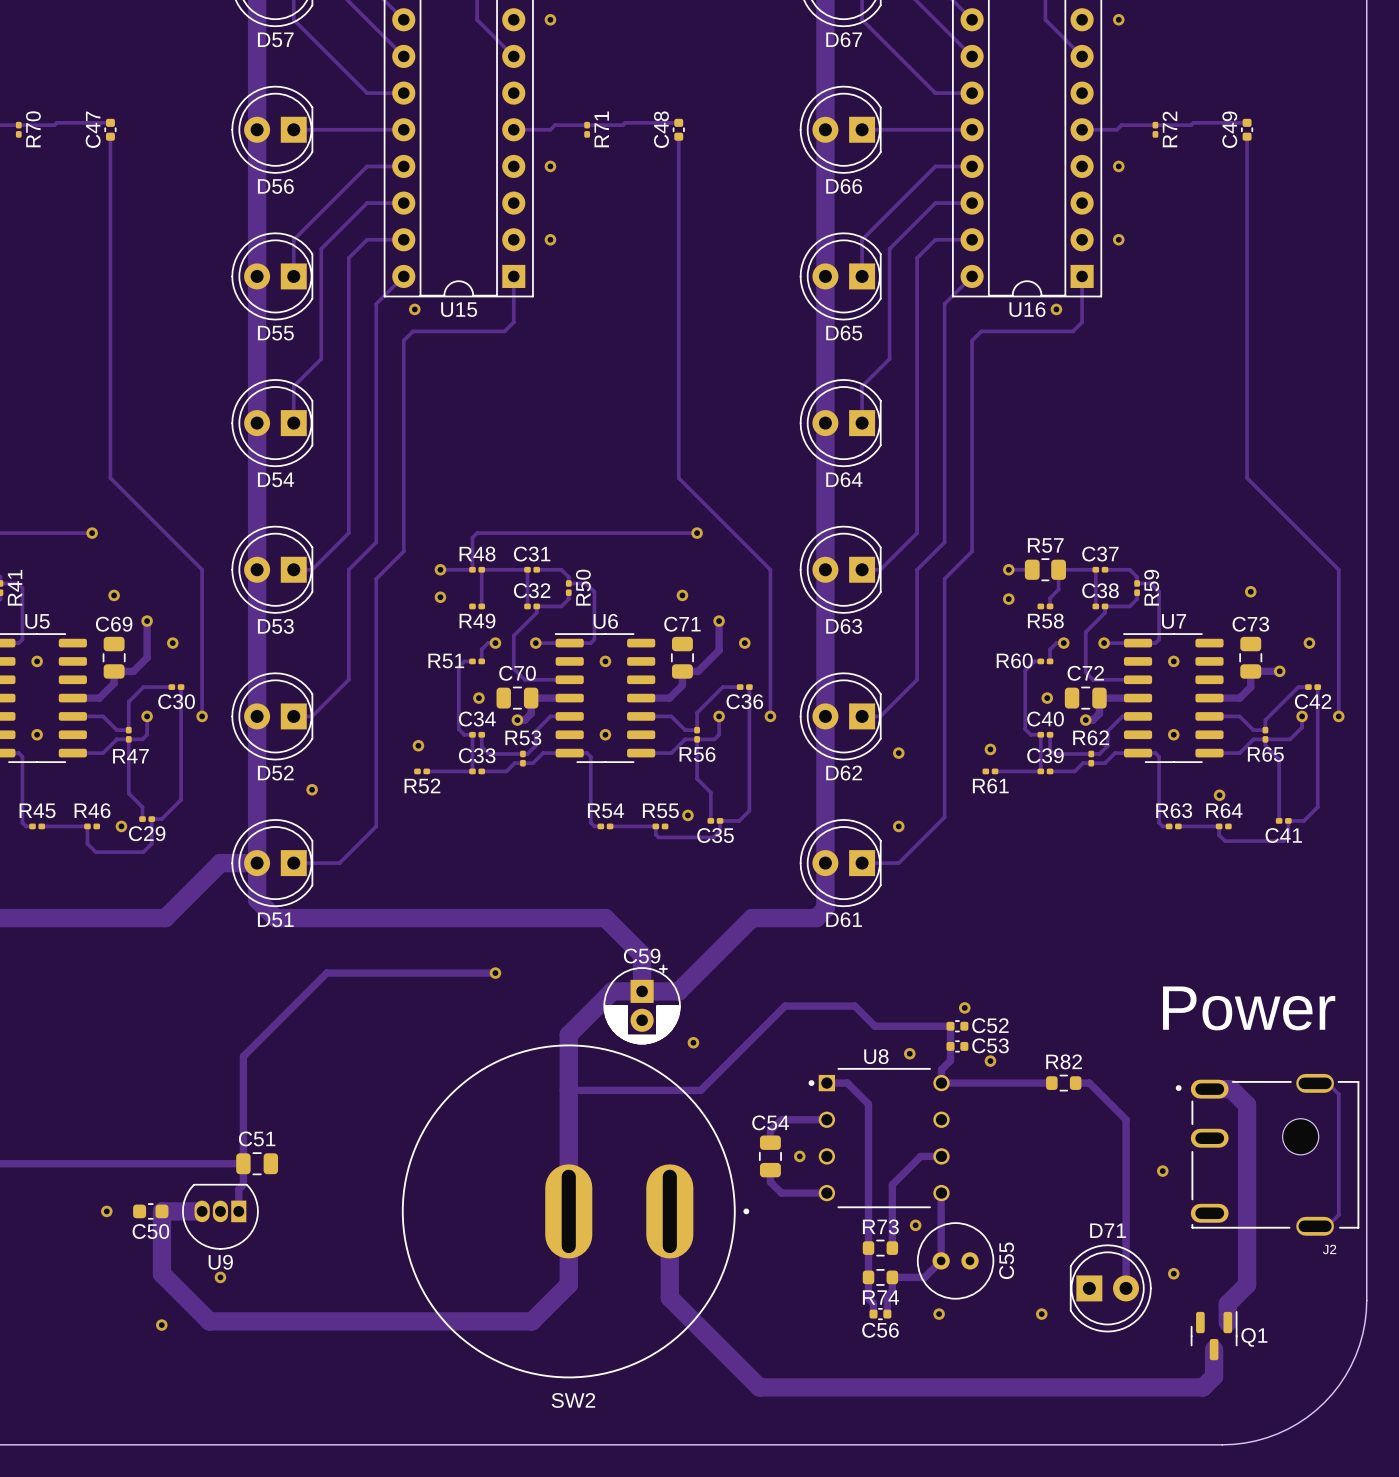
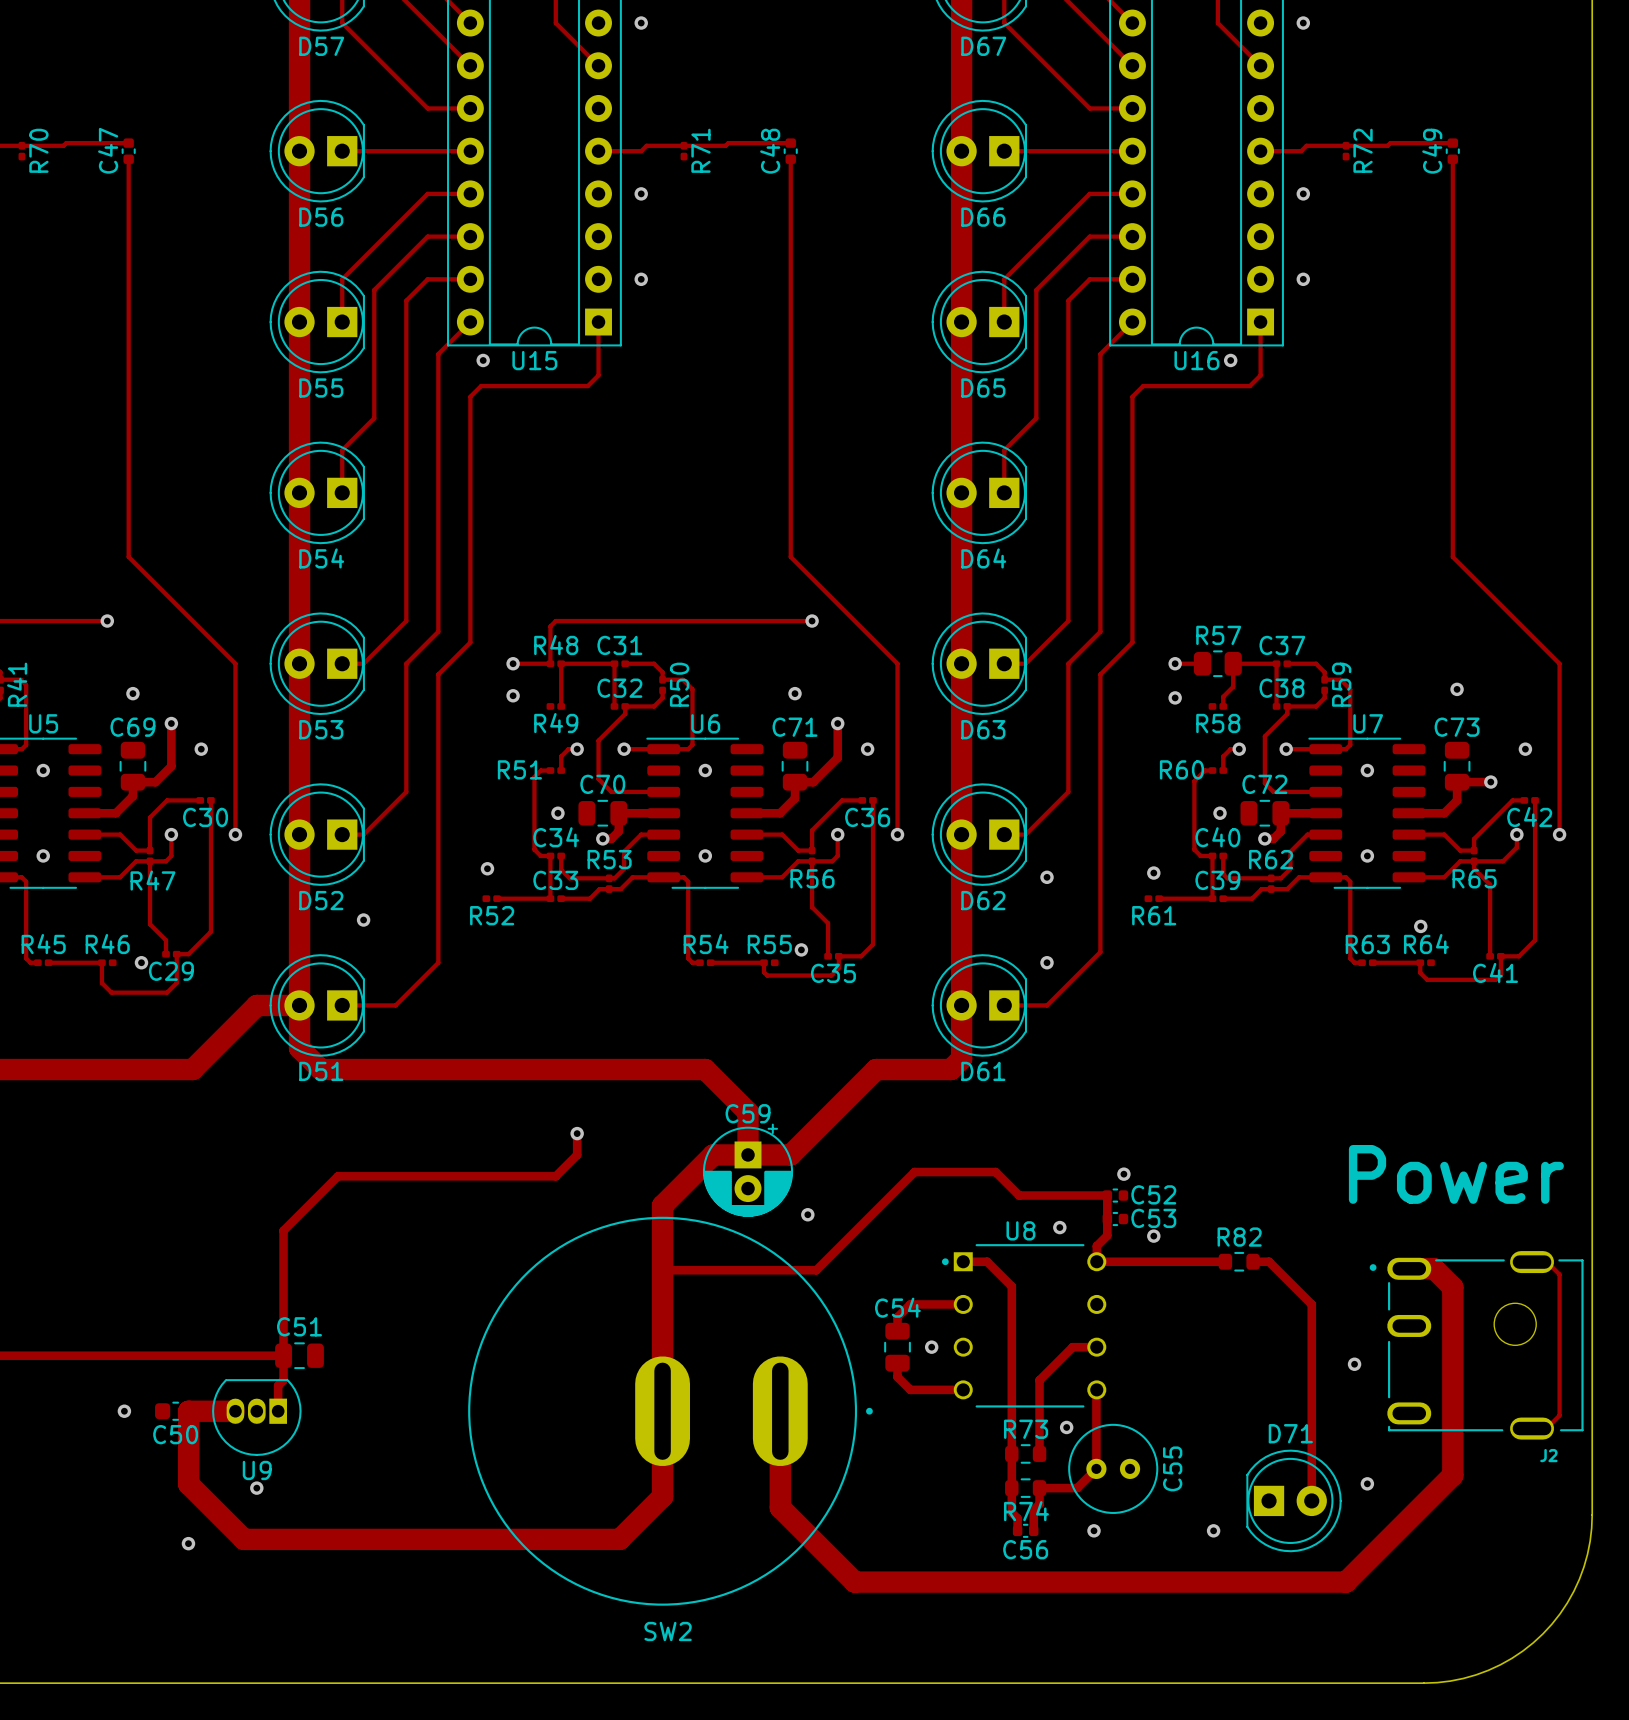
track: (495, 973) (326, 973) (290, 1009) -> (577, 1133) (577, 1154) (555, 1176) (337, 1176)
track: (1247, 1266) (1247, 1284) (1227, 1304) (1227, 1322) -> none
track: (669, 1294) (669, 1297) (759, 1387) (1203, 1387) (1214, 1376) (1214, 1349) -> (780, 1507) (854, 1582) (1346, 1582) (1452, 1475)
Q1: (1214, 1335) -> none

